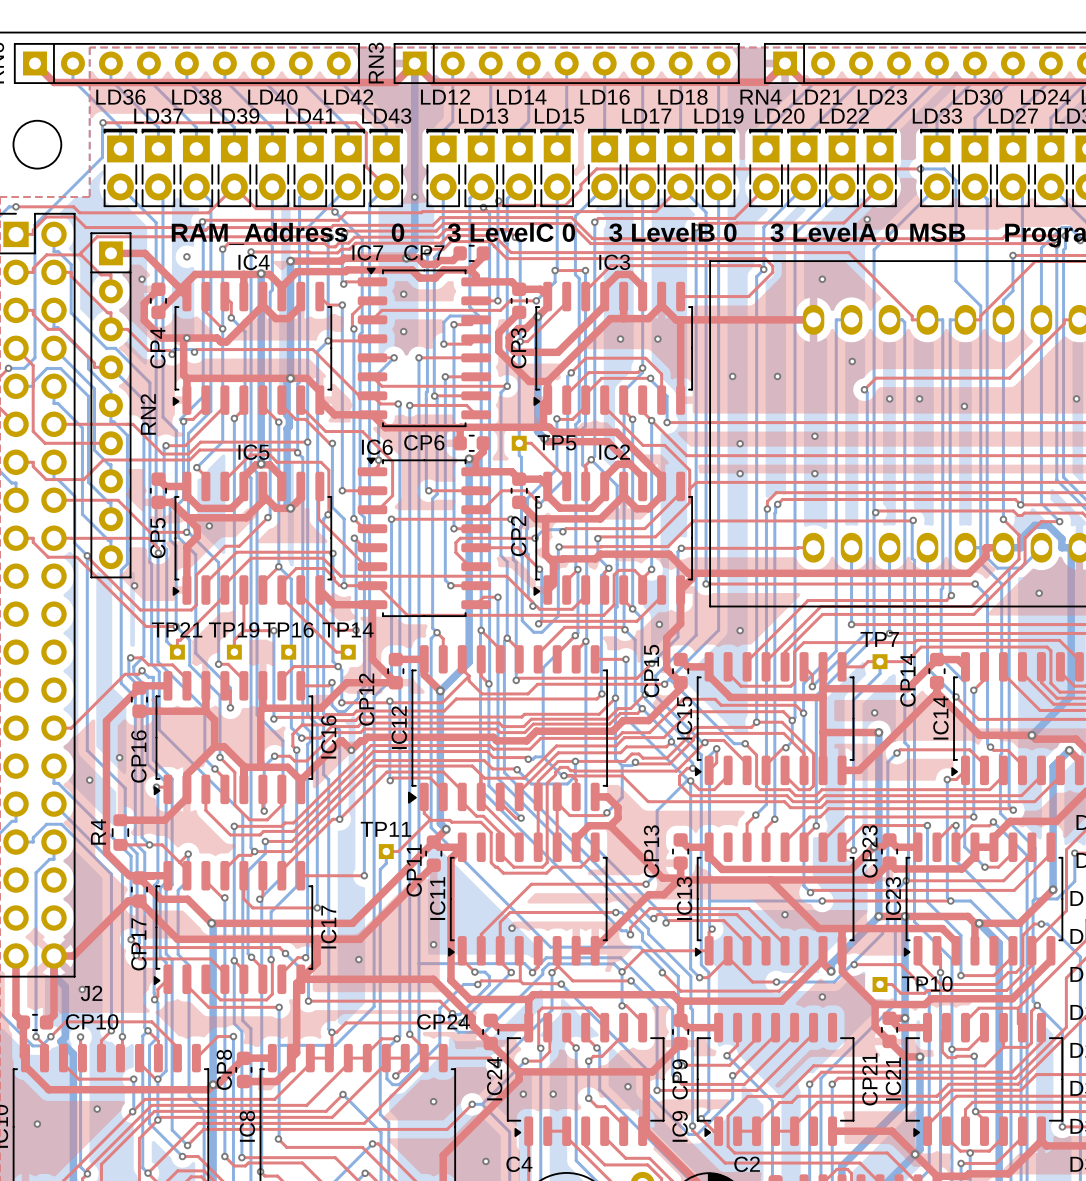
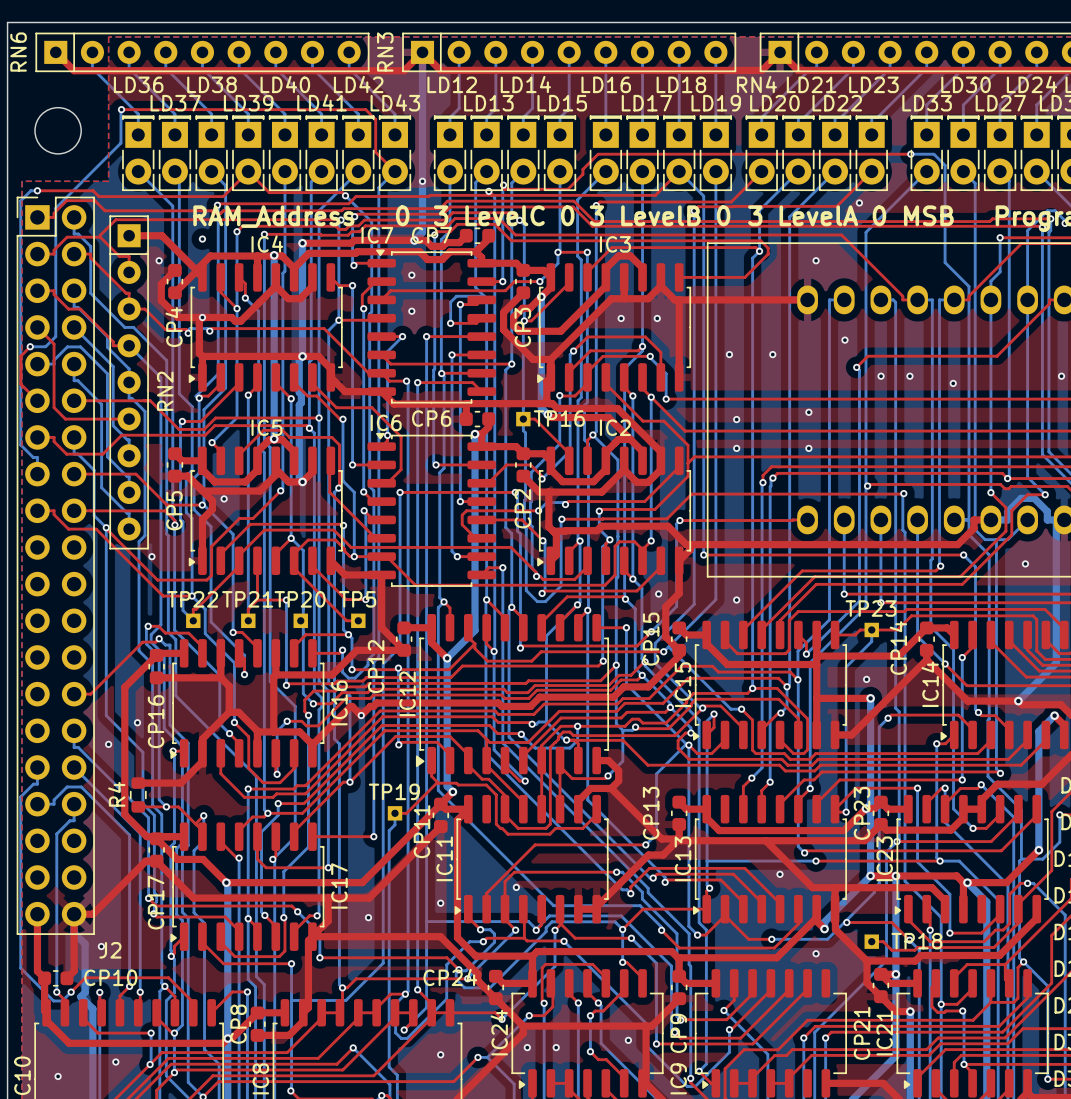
TP5 name: TP5 (556, 442) -> TP16 (559, 418)
TP21 name: TP21 (177, 629) -> TP22 (192, 599)
TP19 name: TP19 (234, 629) -> TP21 (247, 599)
TP16 name: TP16 (288, 629) -> TP20 (300, 599)
TP14 name: TP14 (348, 629) -> TP5 (357, 599)
TP7 name: TP7 (879, 639) -> TP23 (871, 608)
TP11 name: TP11 (386, 829) -> TP19 (394, 791)
TP10 name: TP10 (927, 983) -> TP18 (916, 941)

